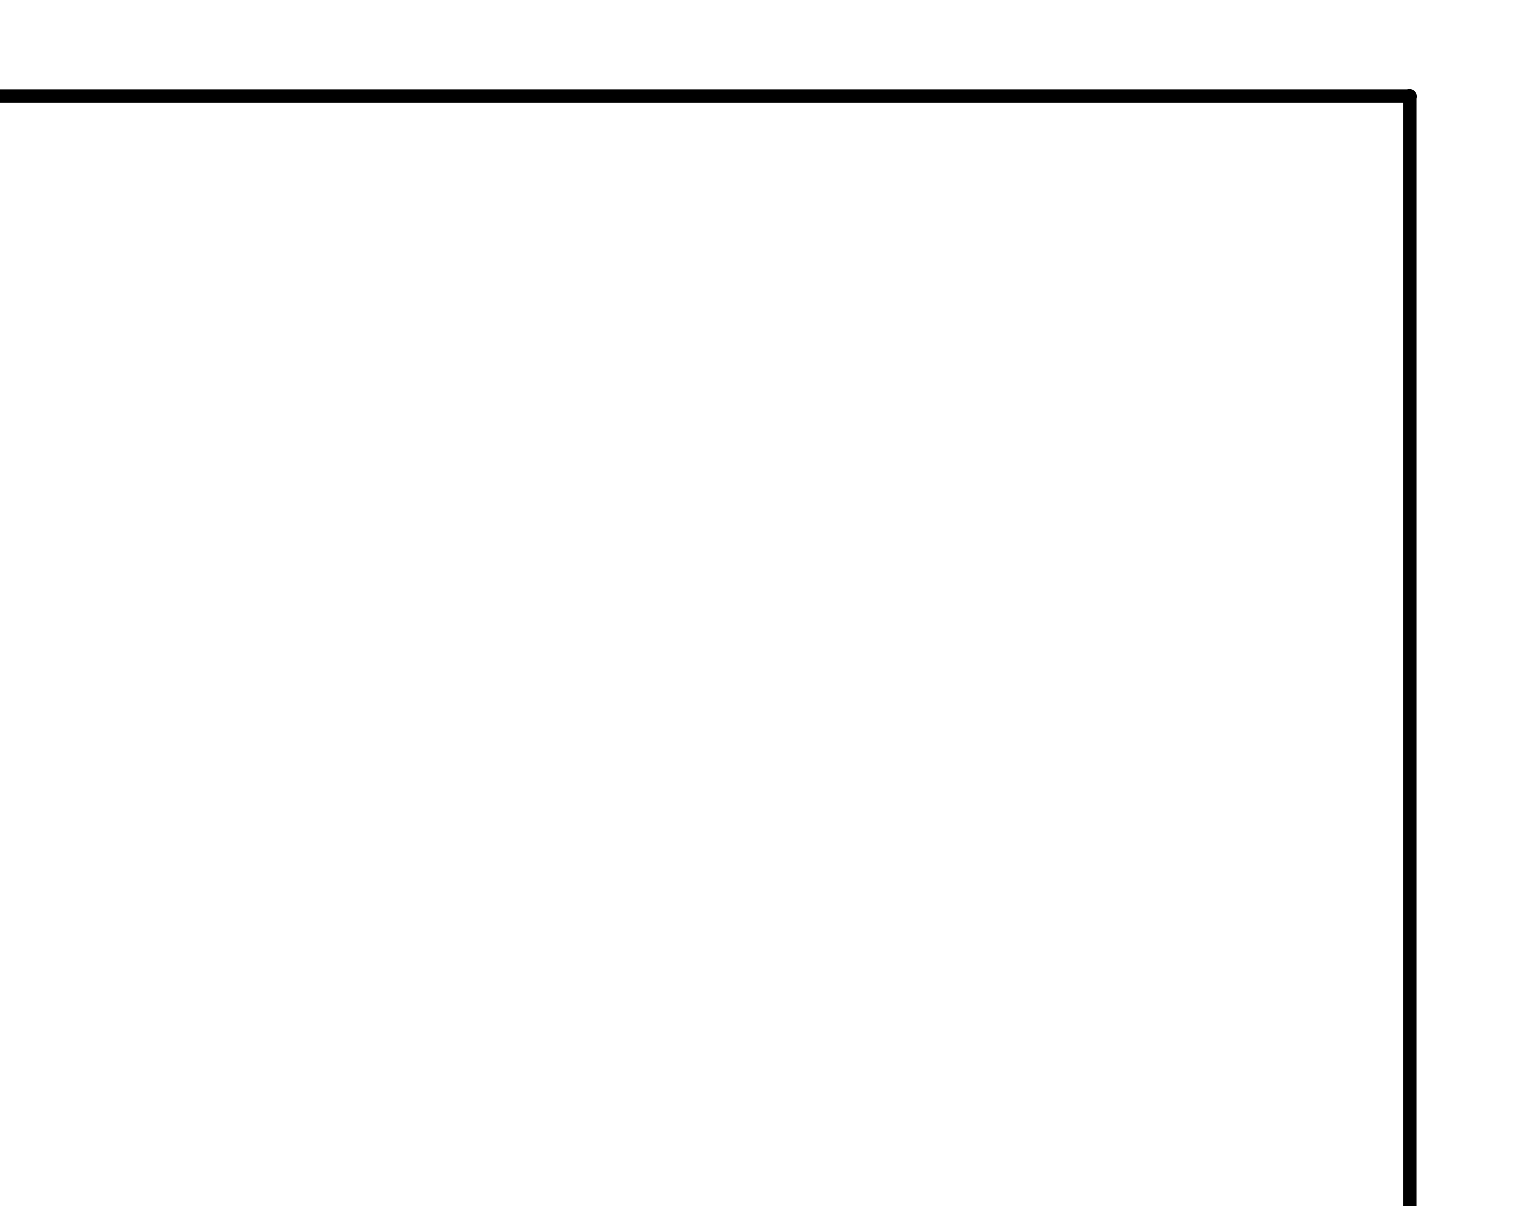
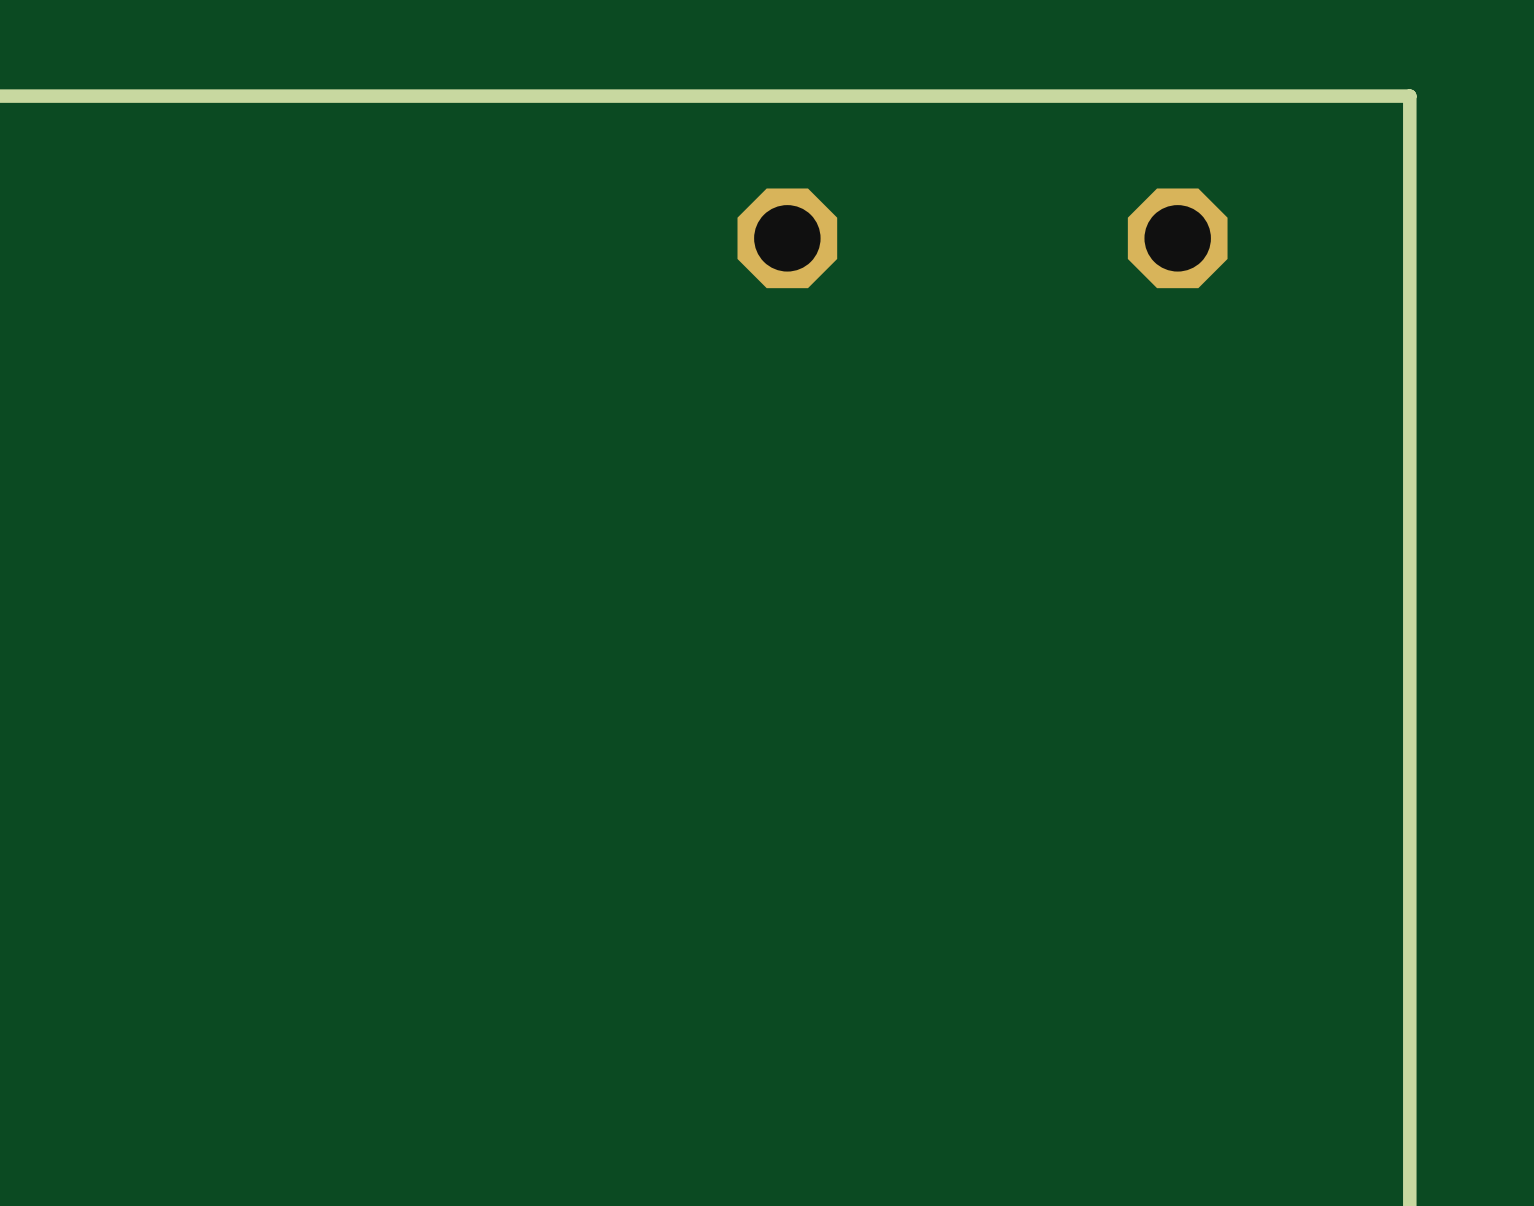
part: none -> (787, 238)
part: none -> (1177, 238)

